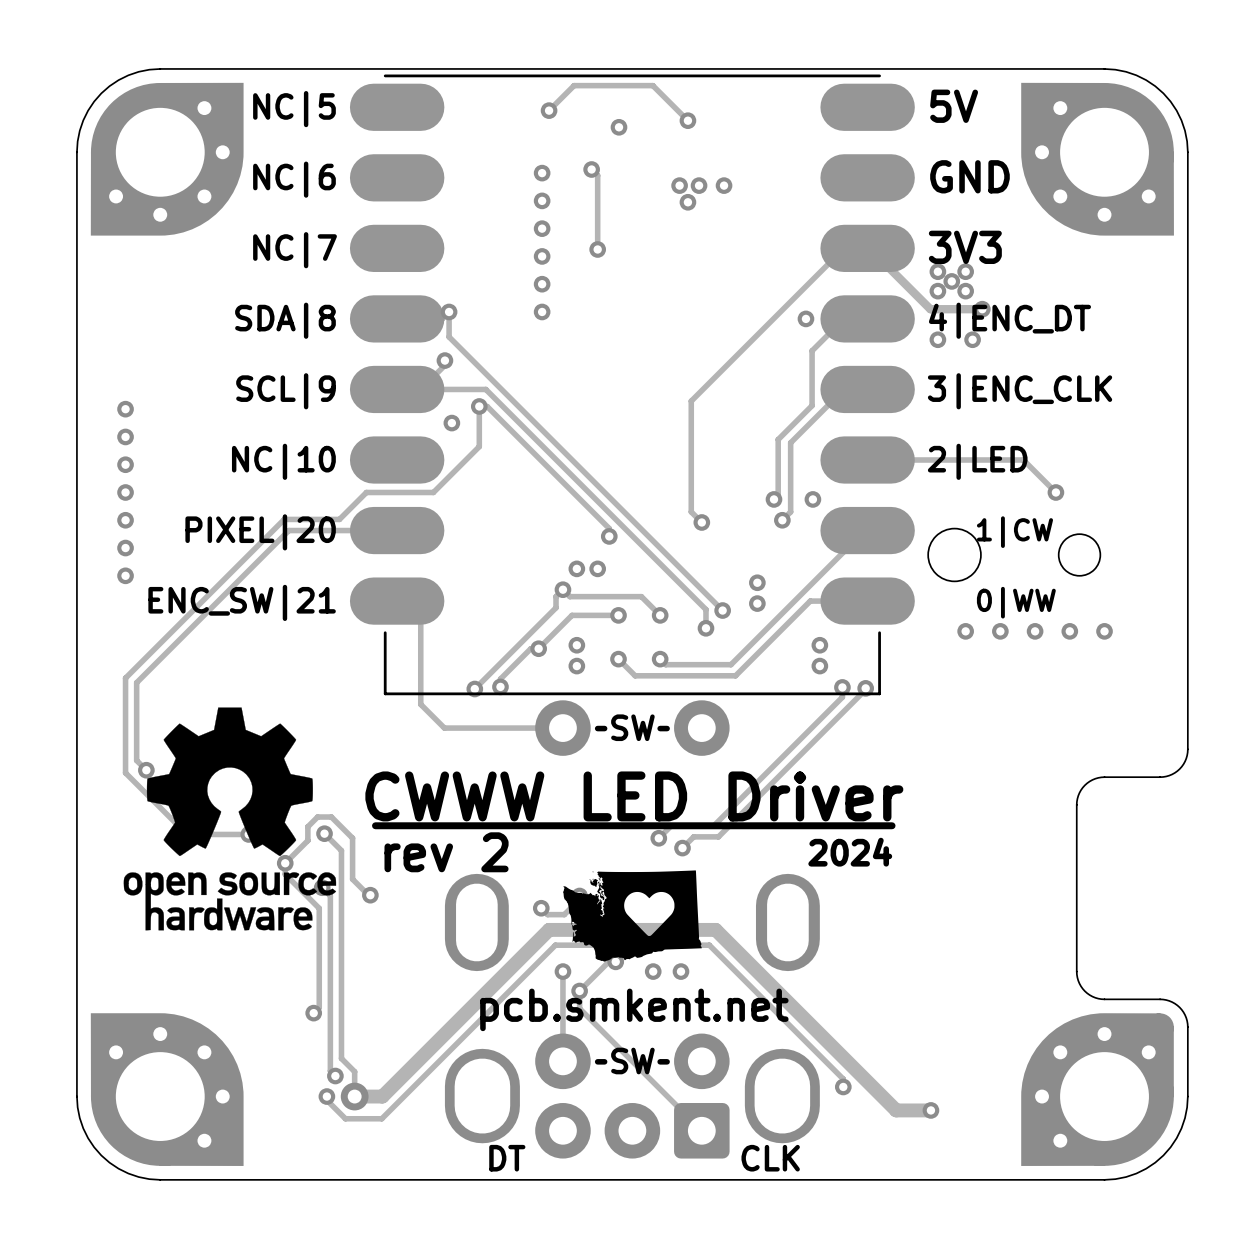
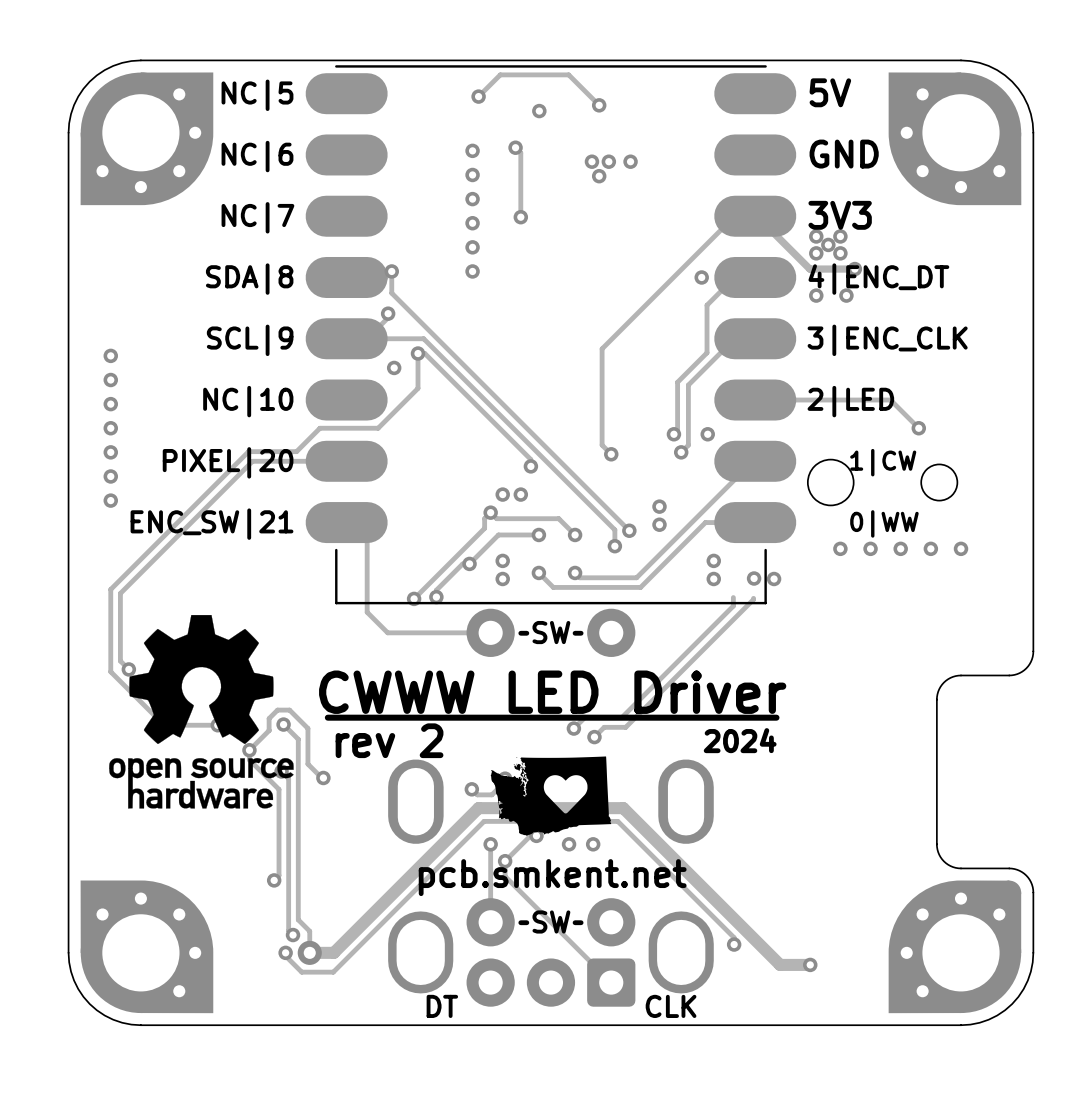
via: none -> (754, 578)
via: none -> (774, 578)
via: (842, 687) -> none
via: (865, 688) -> none

